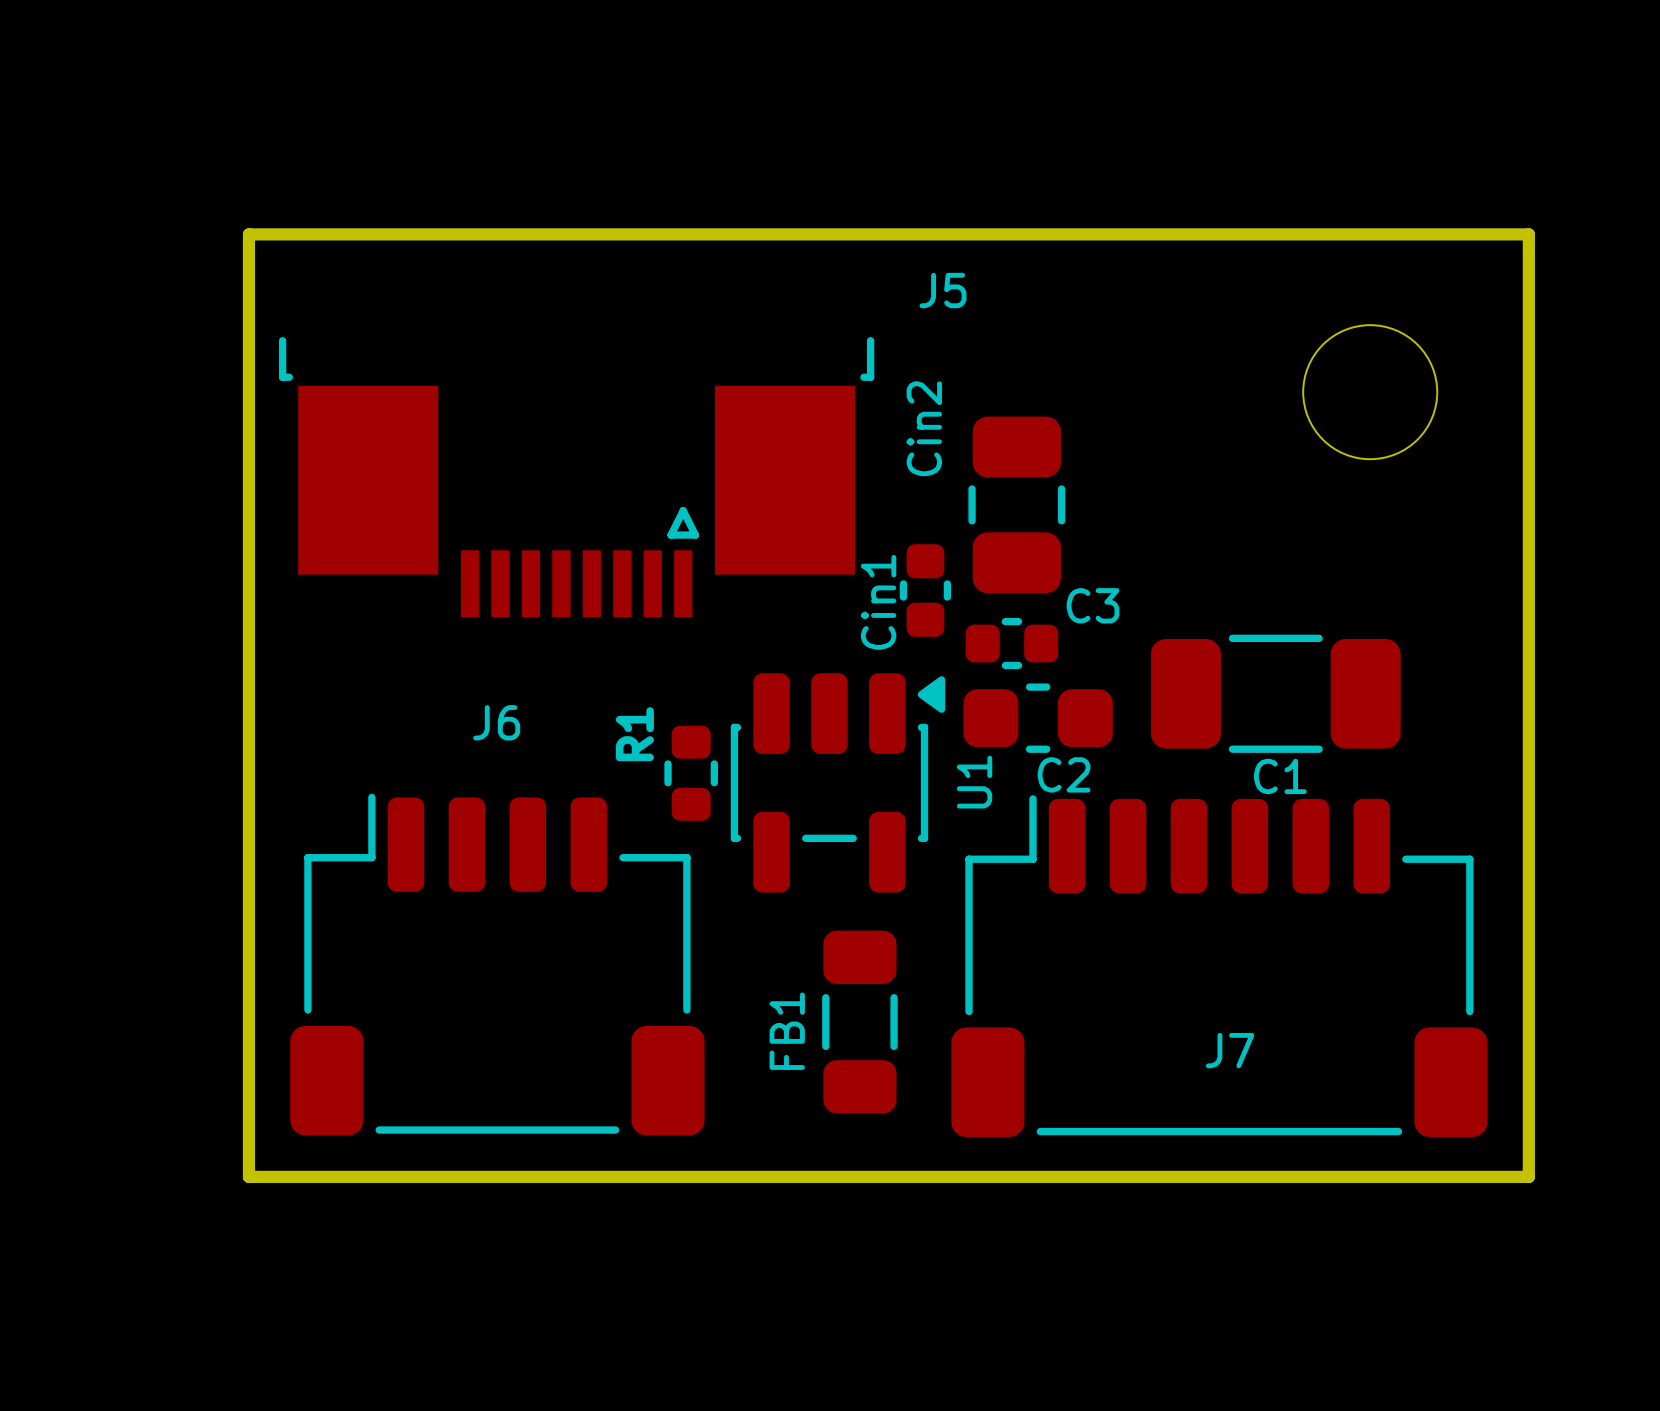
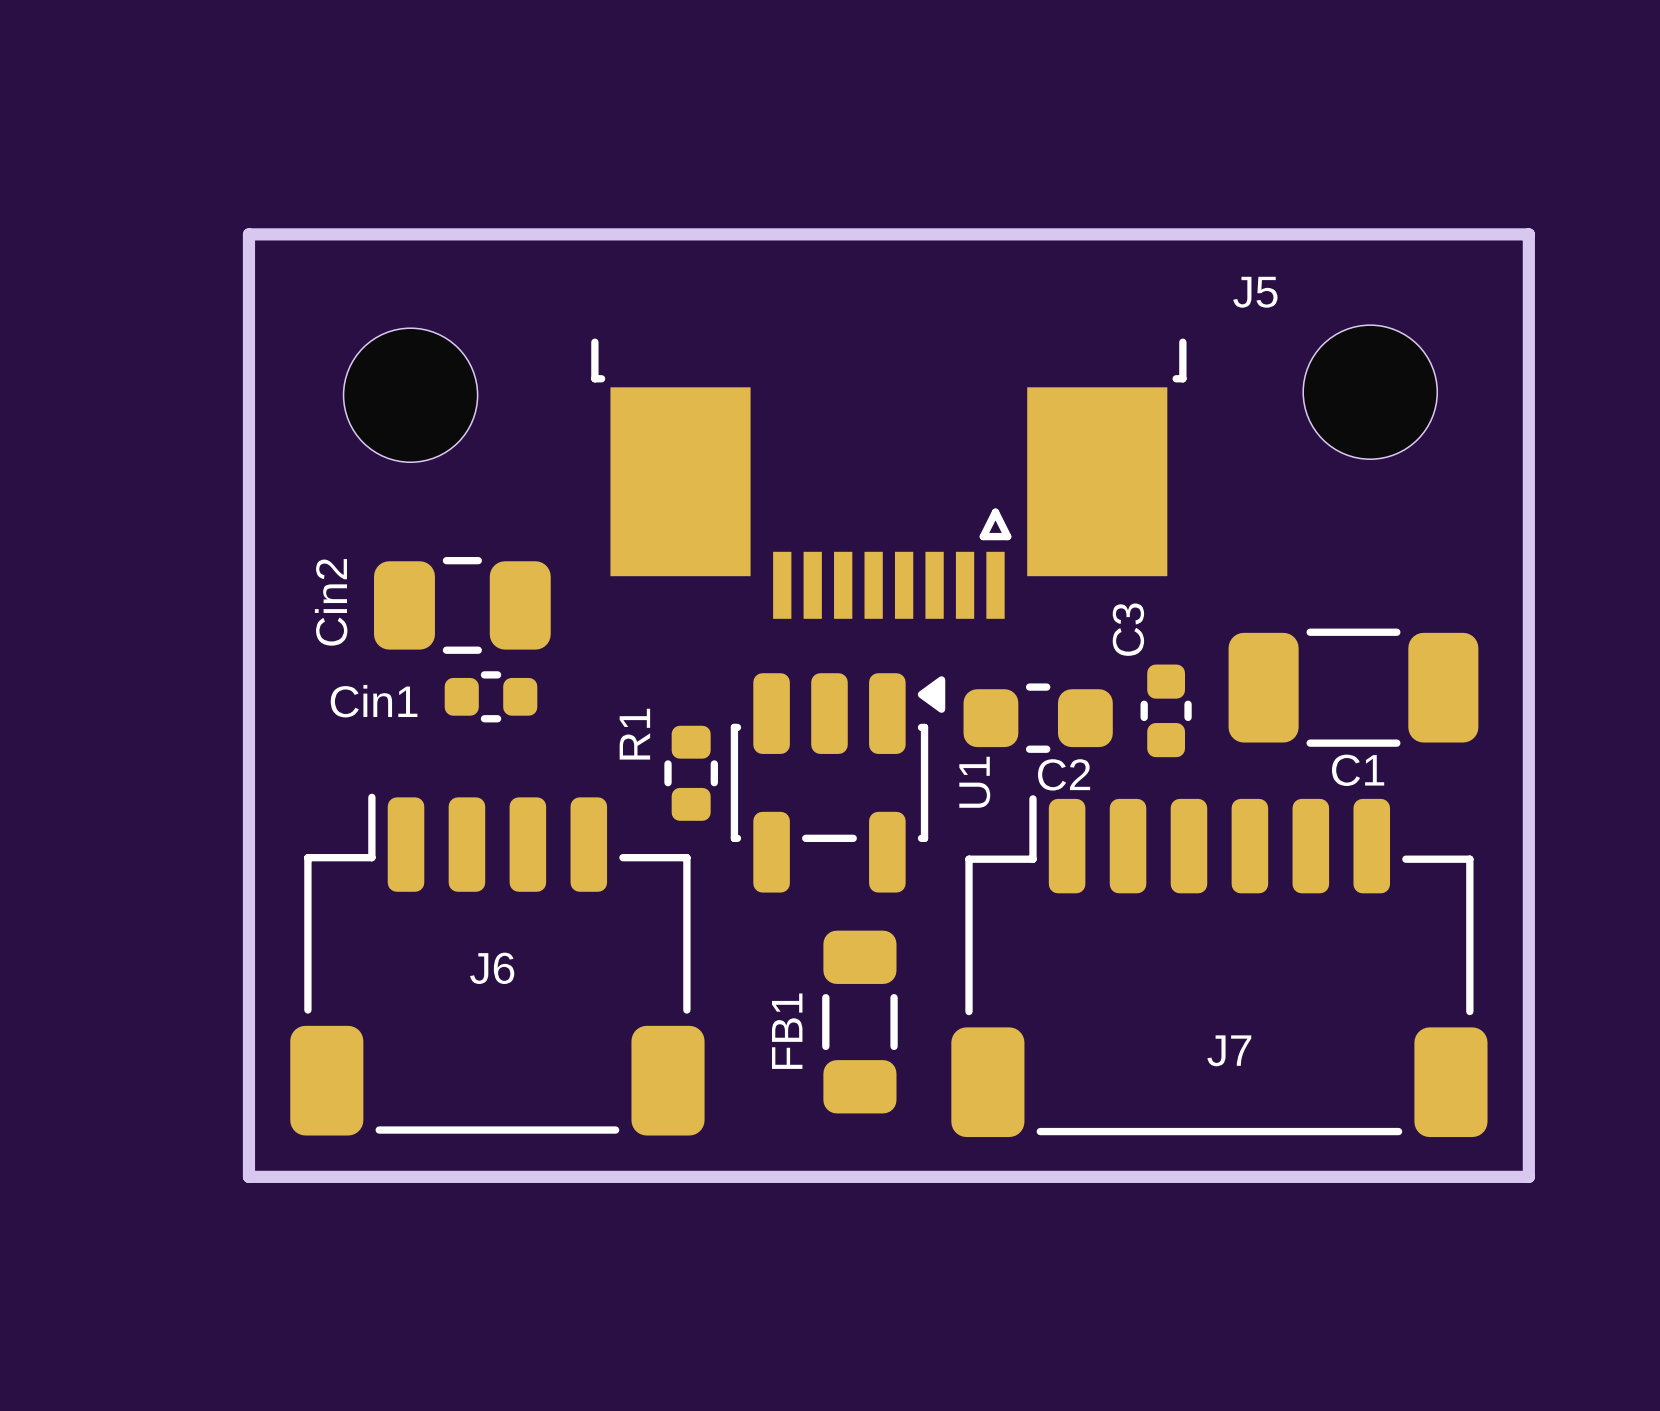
part: none -> (410, 395)
J5 position: (576, 477) -> (888, 478)
Cin2 rotation: 0° (1016, 504) -> 90° clockwise (462, 605)
Cin2 position: (1016, 504) -> (462, 605)
Cin1 rotation: 0° (925, 590) -> 90° clockwise (491, 696)
Cin1 position: (925, 590) -> (491, 696)
C3 name position: C3 (1093, 605) -> C3 (1128, 629)
C3 rotation: 0° (1011, 643) -> 90° clockwise (1166, 710)
C3 position: (1011, 643) -> (1166, 710)
C1 position: (1275, 693) -> (1353, 687)
J6 name position: J6 (496, 722) -> J6 (492, 968)

